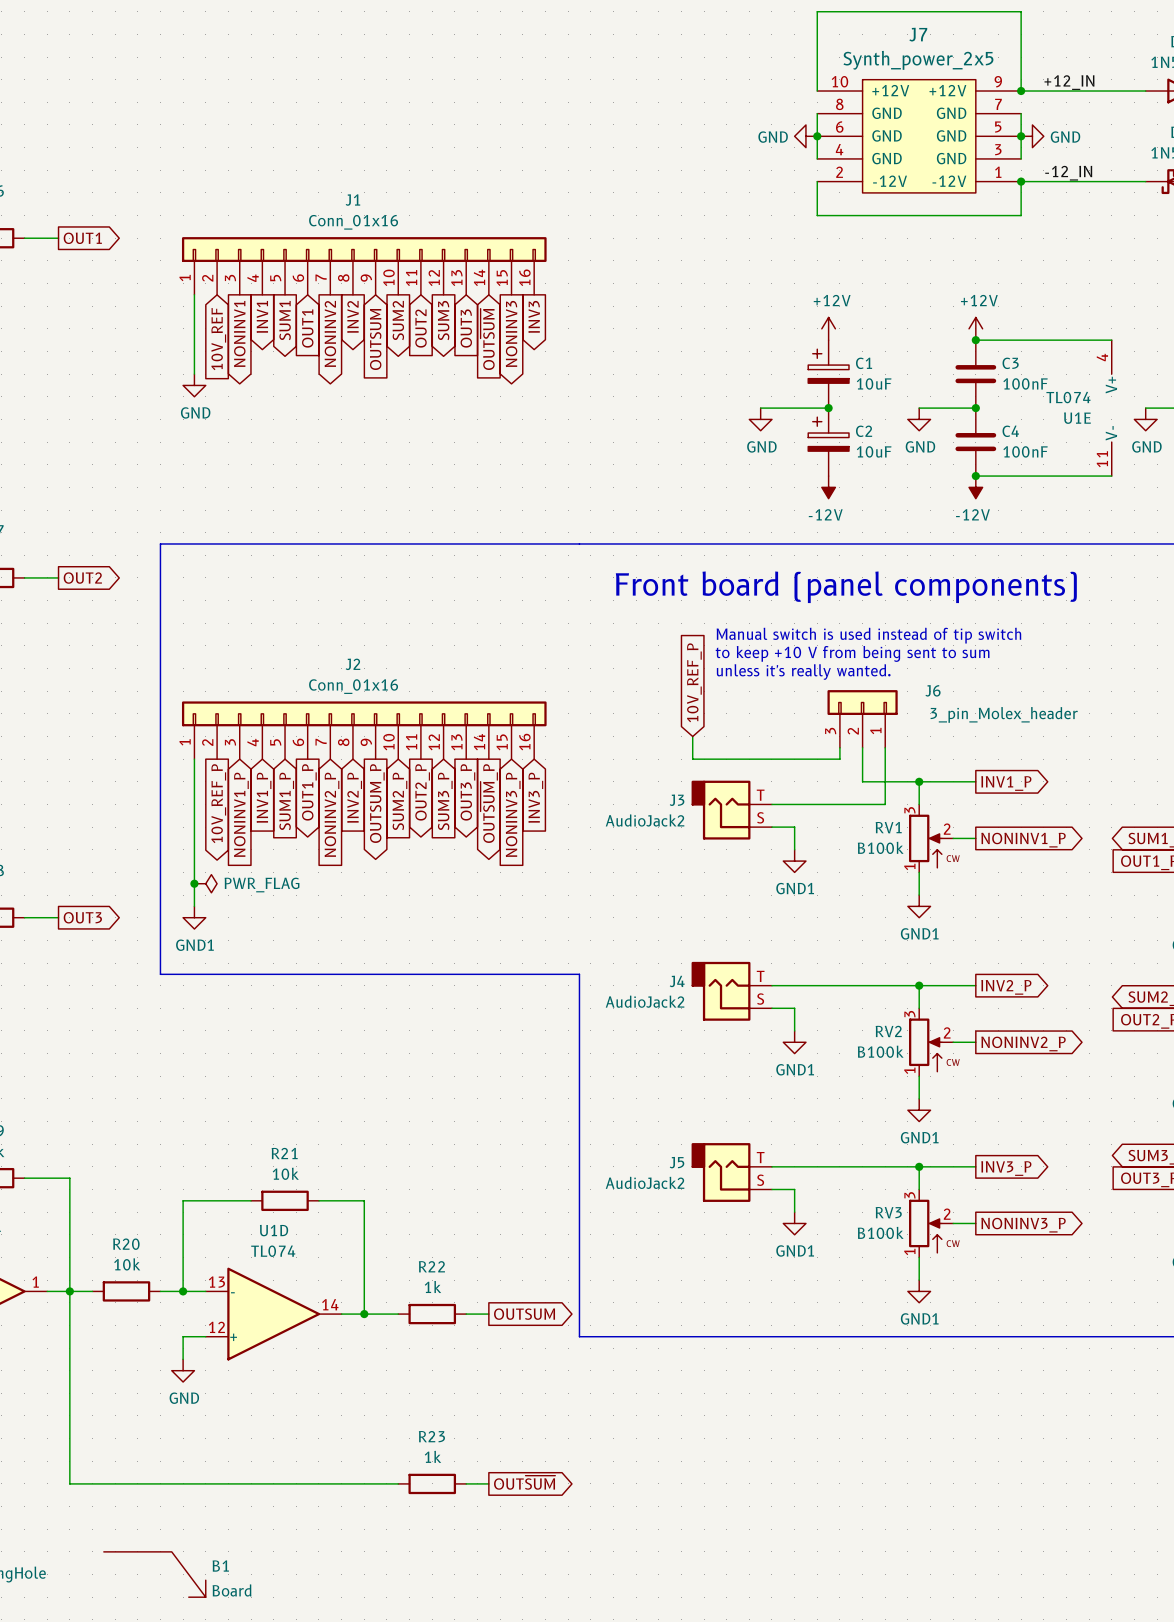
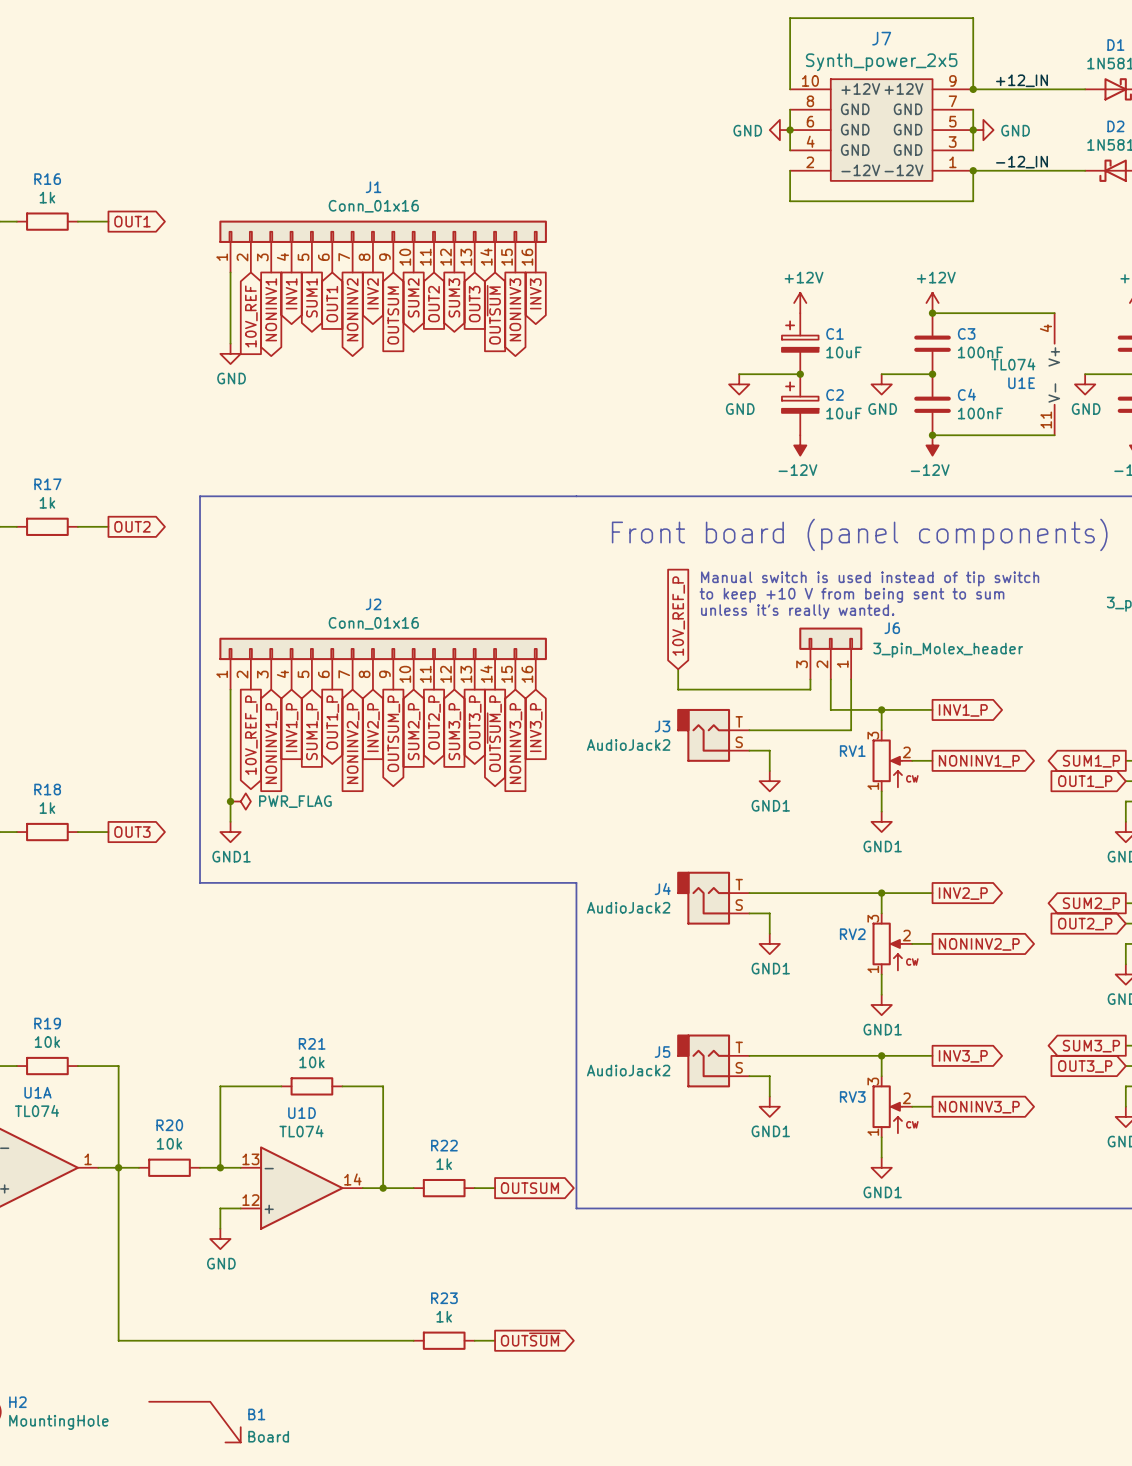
RV1 value: B100k (880, 847) -> none
RV2 value: B100k (880, 1051) -> none
RV3 value: B100k (880, 1232) -> none

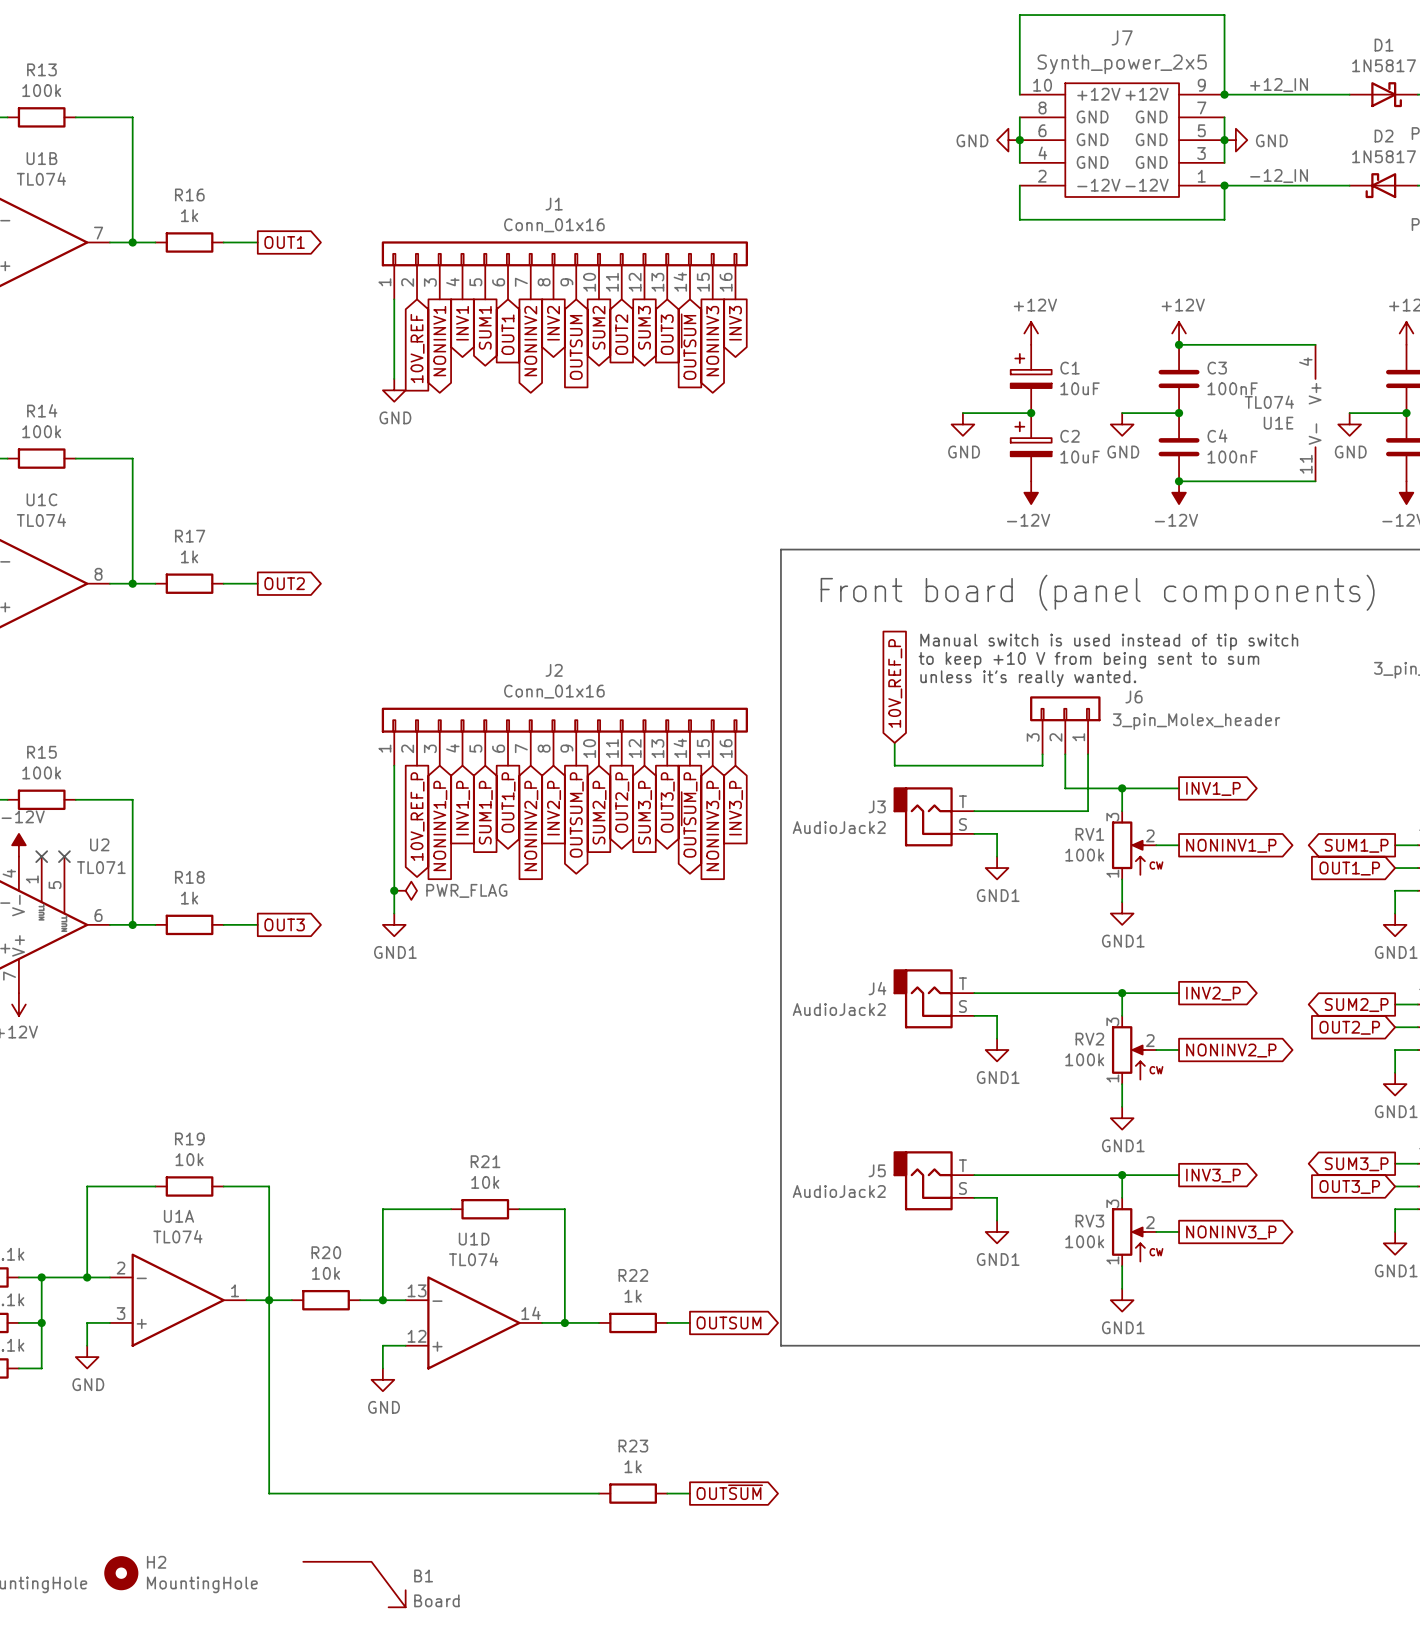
line: (576, 496) (200, 496) (200, 882) (576, 882) -> (780, 549) (780, 981)
RV1 value: none -> 100k (1084, 855)
RV2 value: none -> 100k (1084, 1059)
RV3 value: none -> 100k (1084, 1241)

